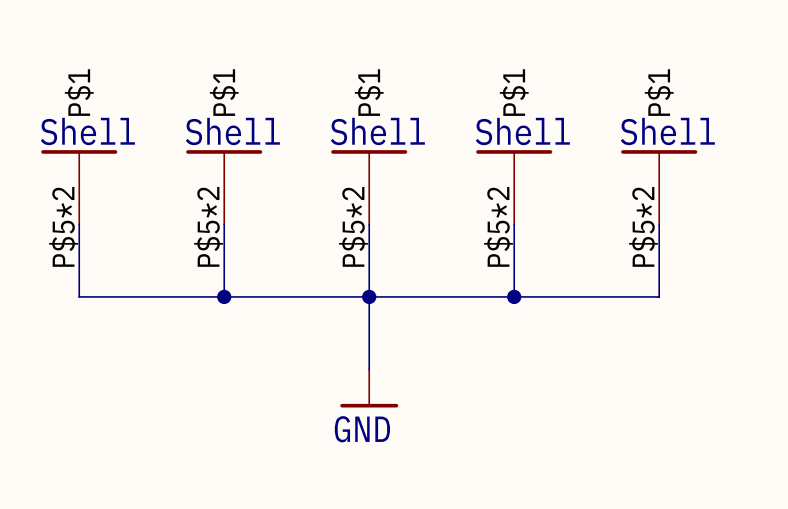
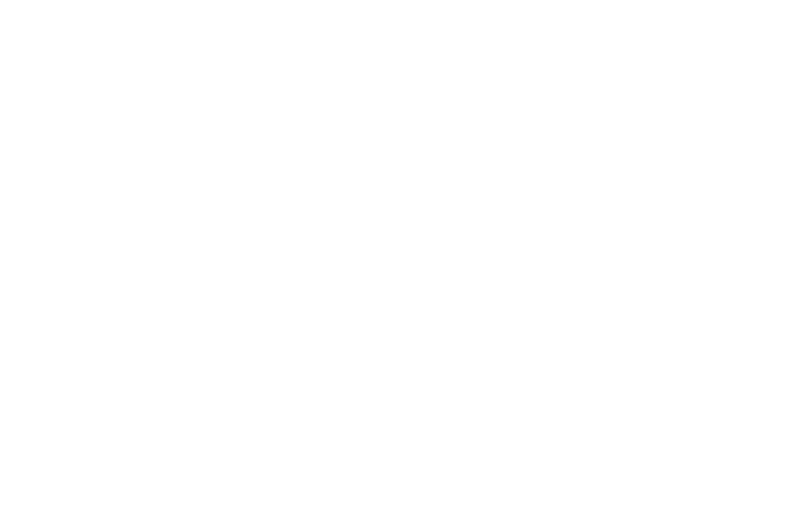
part: (79, 187) -> none
part: (224, 187) -> none
part: (369, 187) -> none
part: (514, 187) -> none
part: (659, 187) -> none
wire: (79, 224) (79, 296) (659, 296) (659, 224) -> none
wire: (224, 224) (224, 296) -> none
wire: (369, 224) (369, 369) -> none
wire: (514, 224) (514, 296) -> none
junction: (224, 296) -> none
junction: (369, 296) -> none
junction: (514, 296) -> none
power symbol: GND (369, 388) -> none

